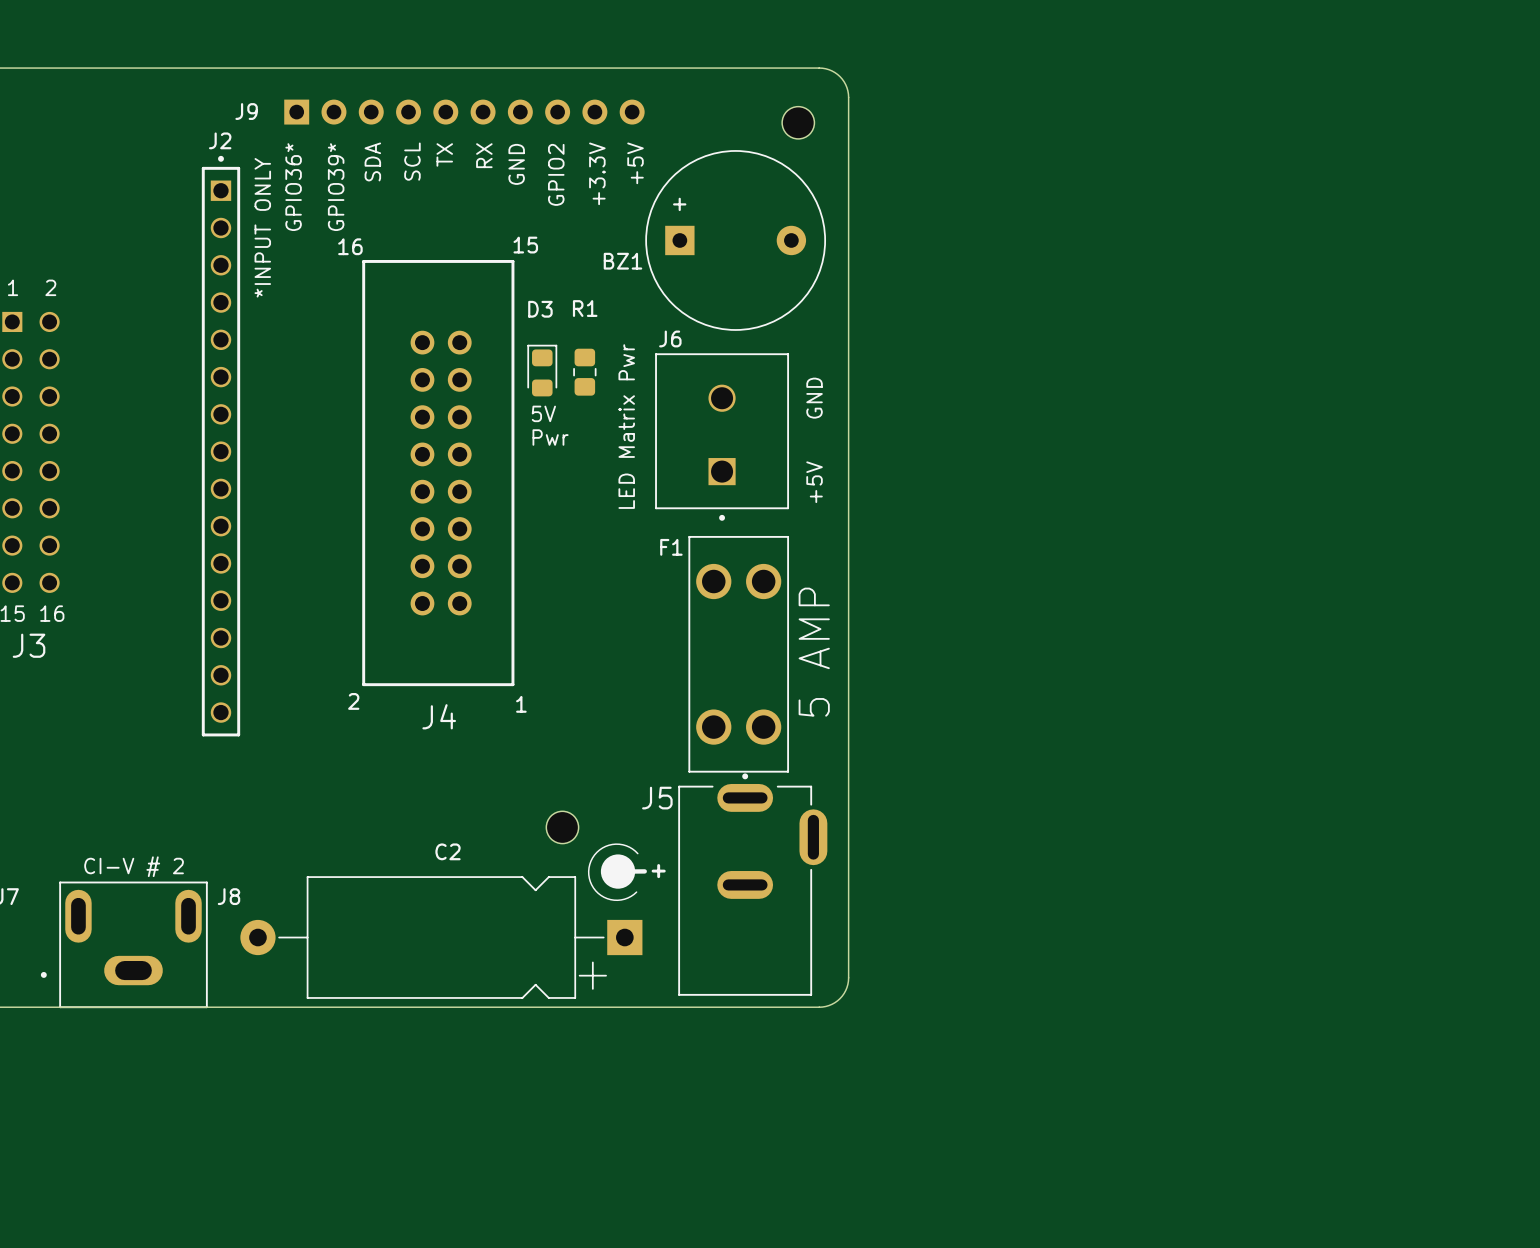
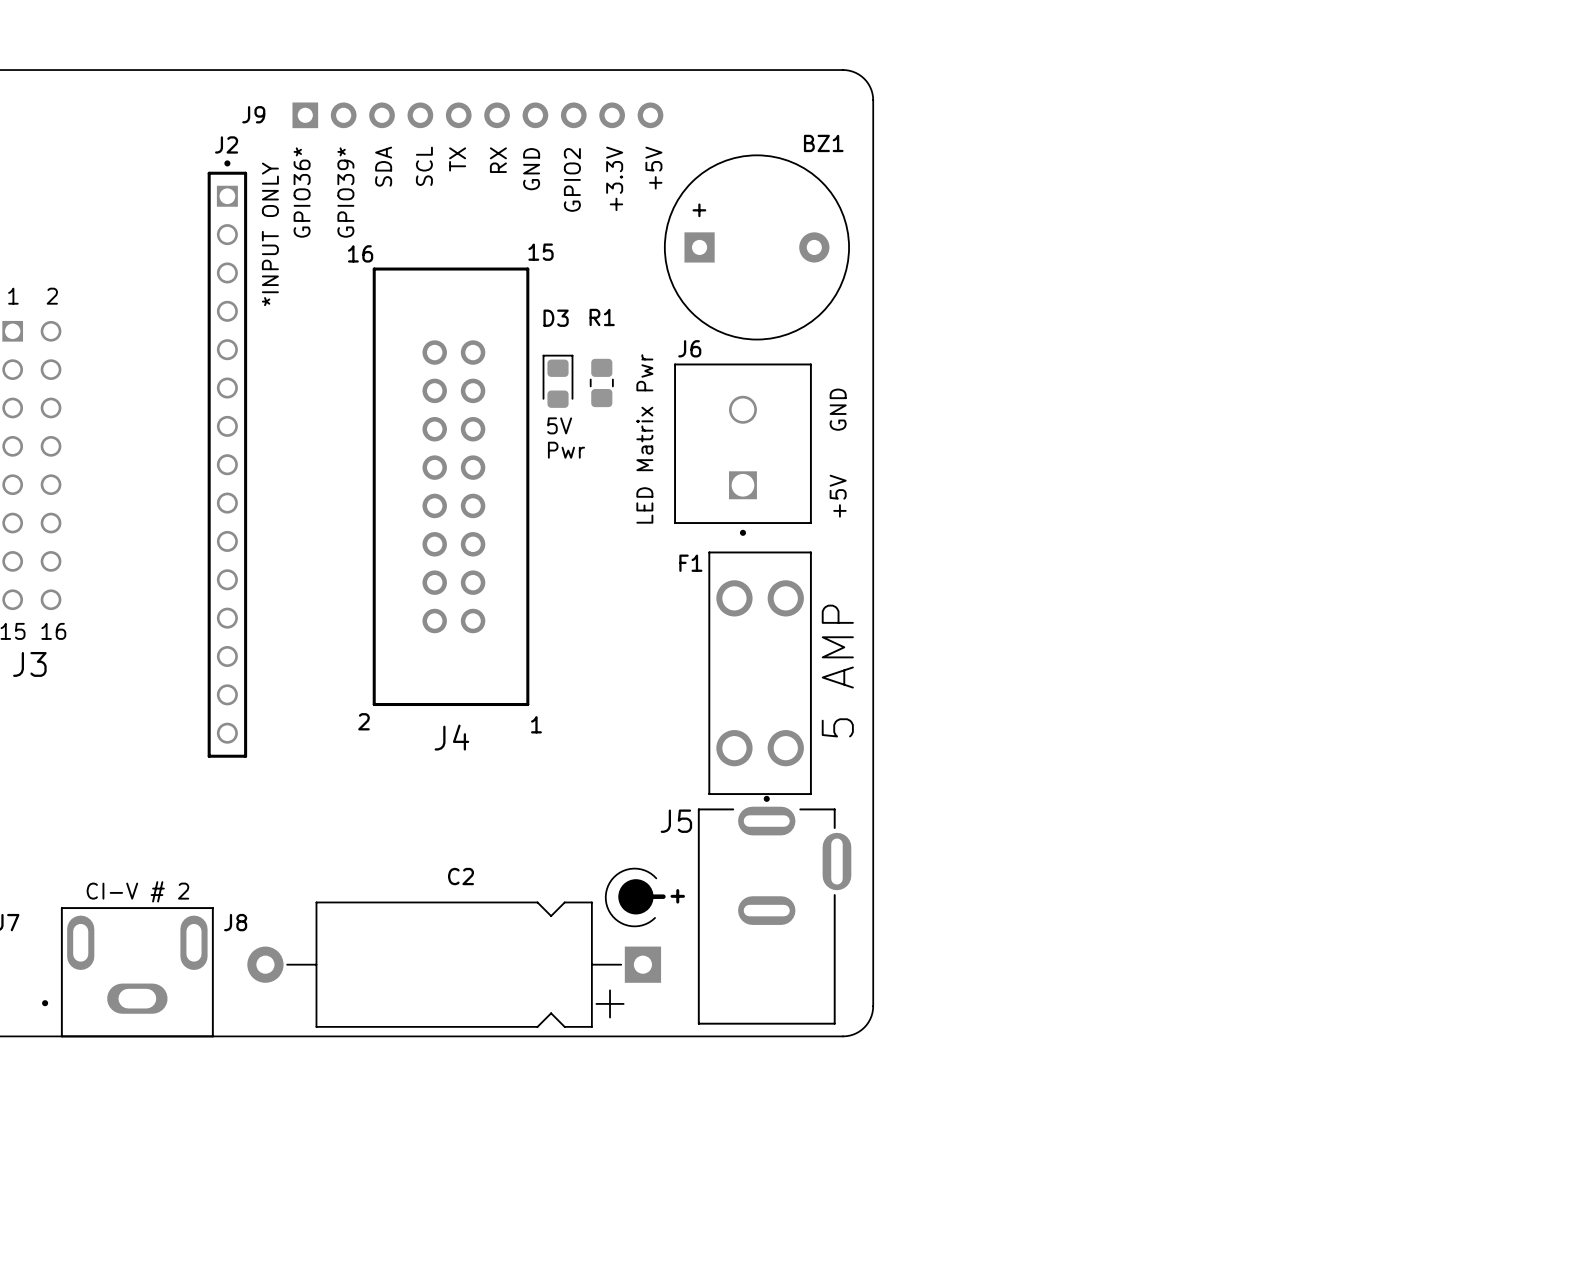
part: (798, 122) -> none
BZ1 name position: BZ1 (622, 261) -> BZ1 (823, 143)
part: (562, 827) -> none

